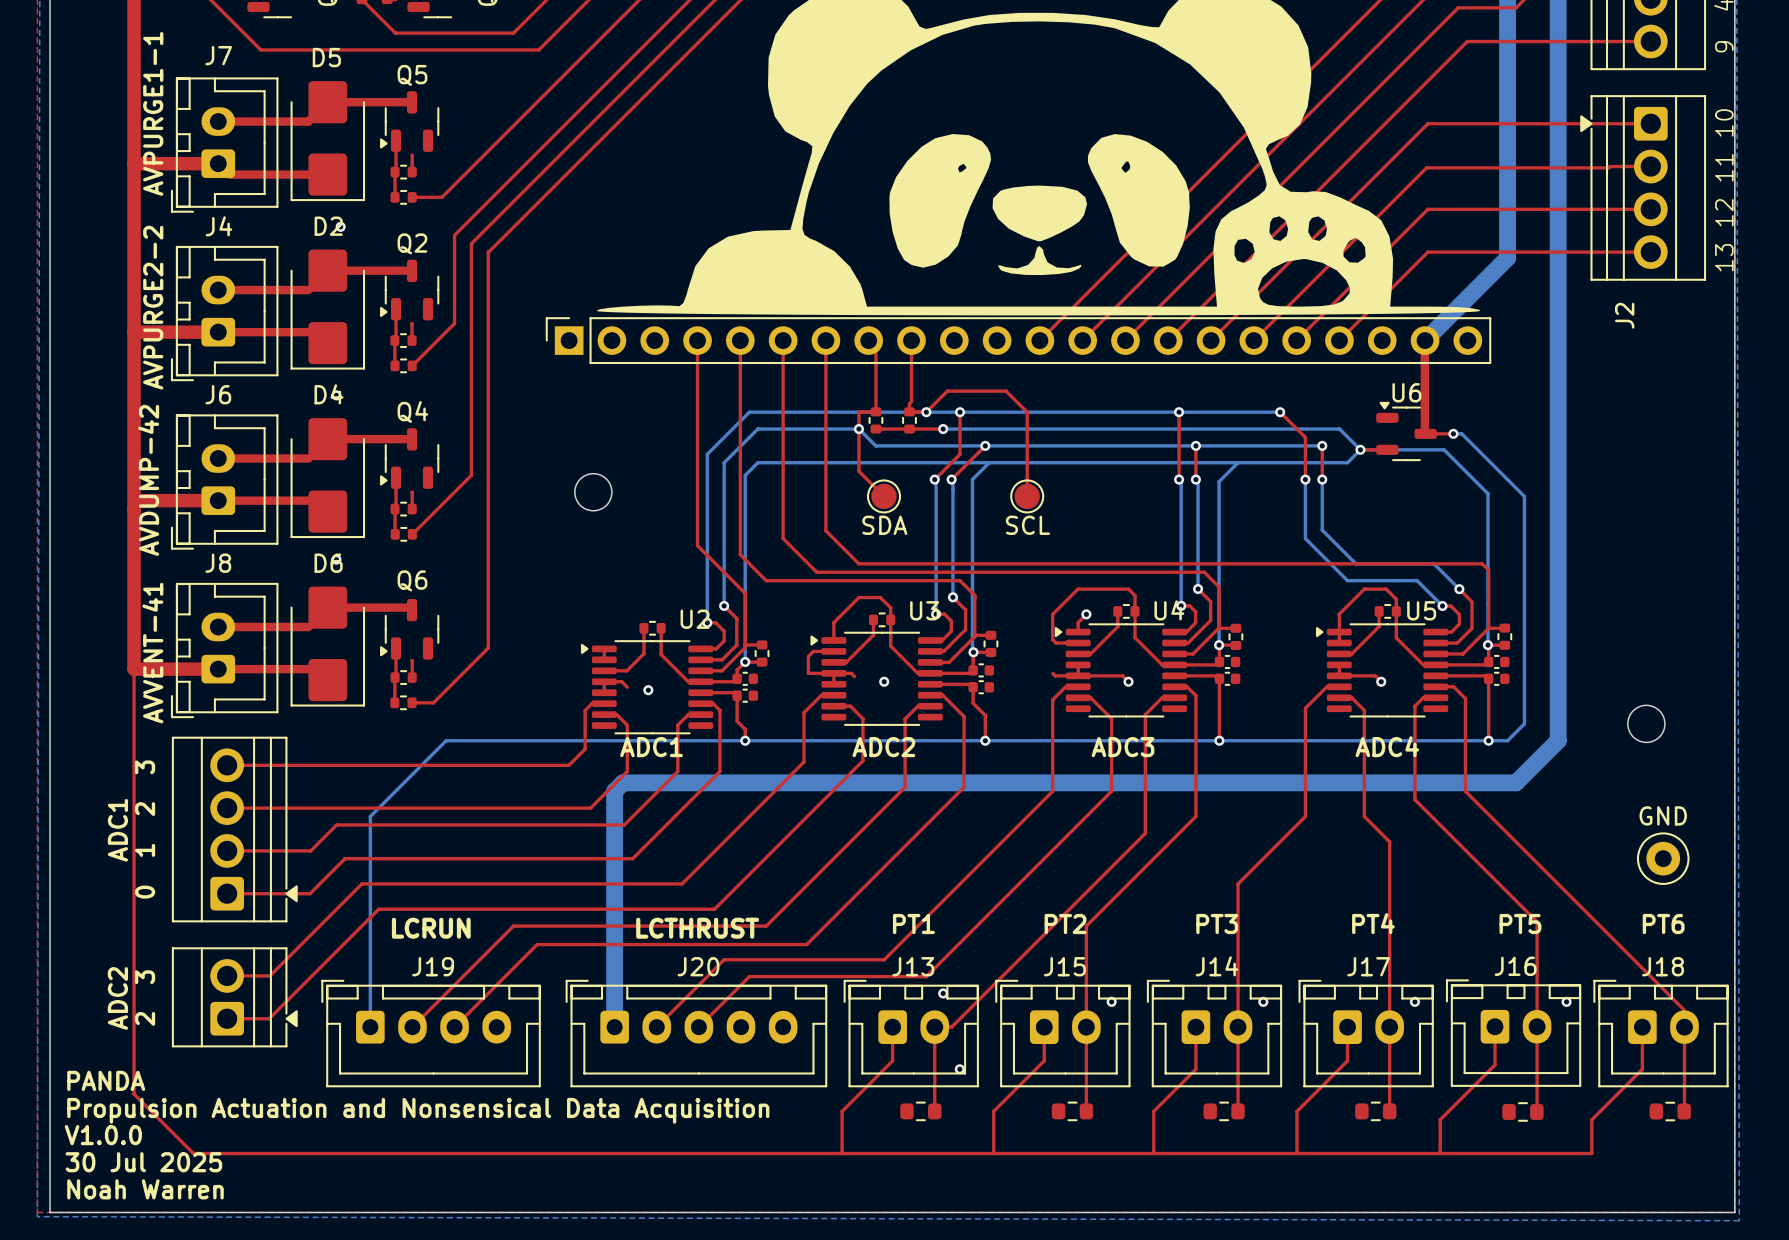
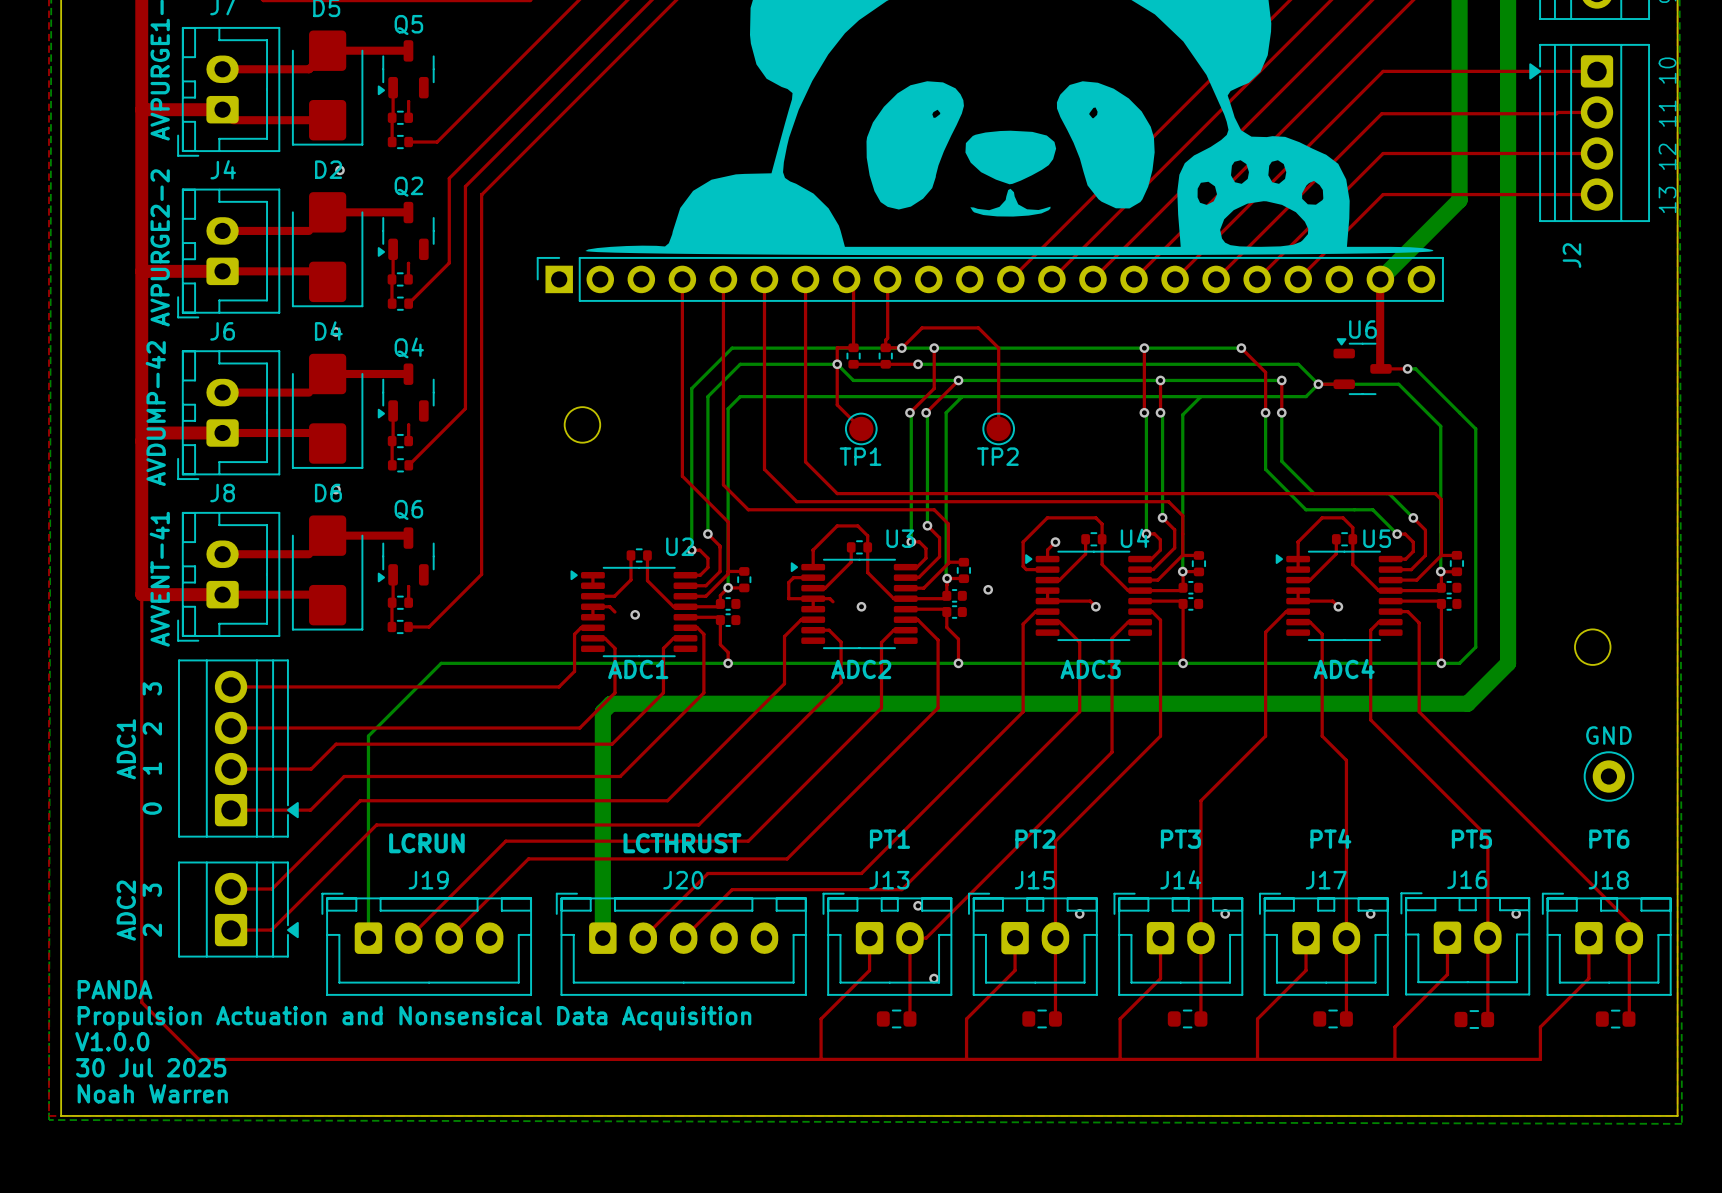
SDA name: SDA (884, 525) -> TP1 (860, 456)
SCL name: SCL (1028, 525) -> TP2 (997, 456)
via: none -> (988, 589)
top track: (1052, 673) (1055, 675) (1078, 675) -> none

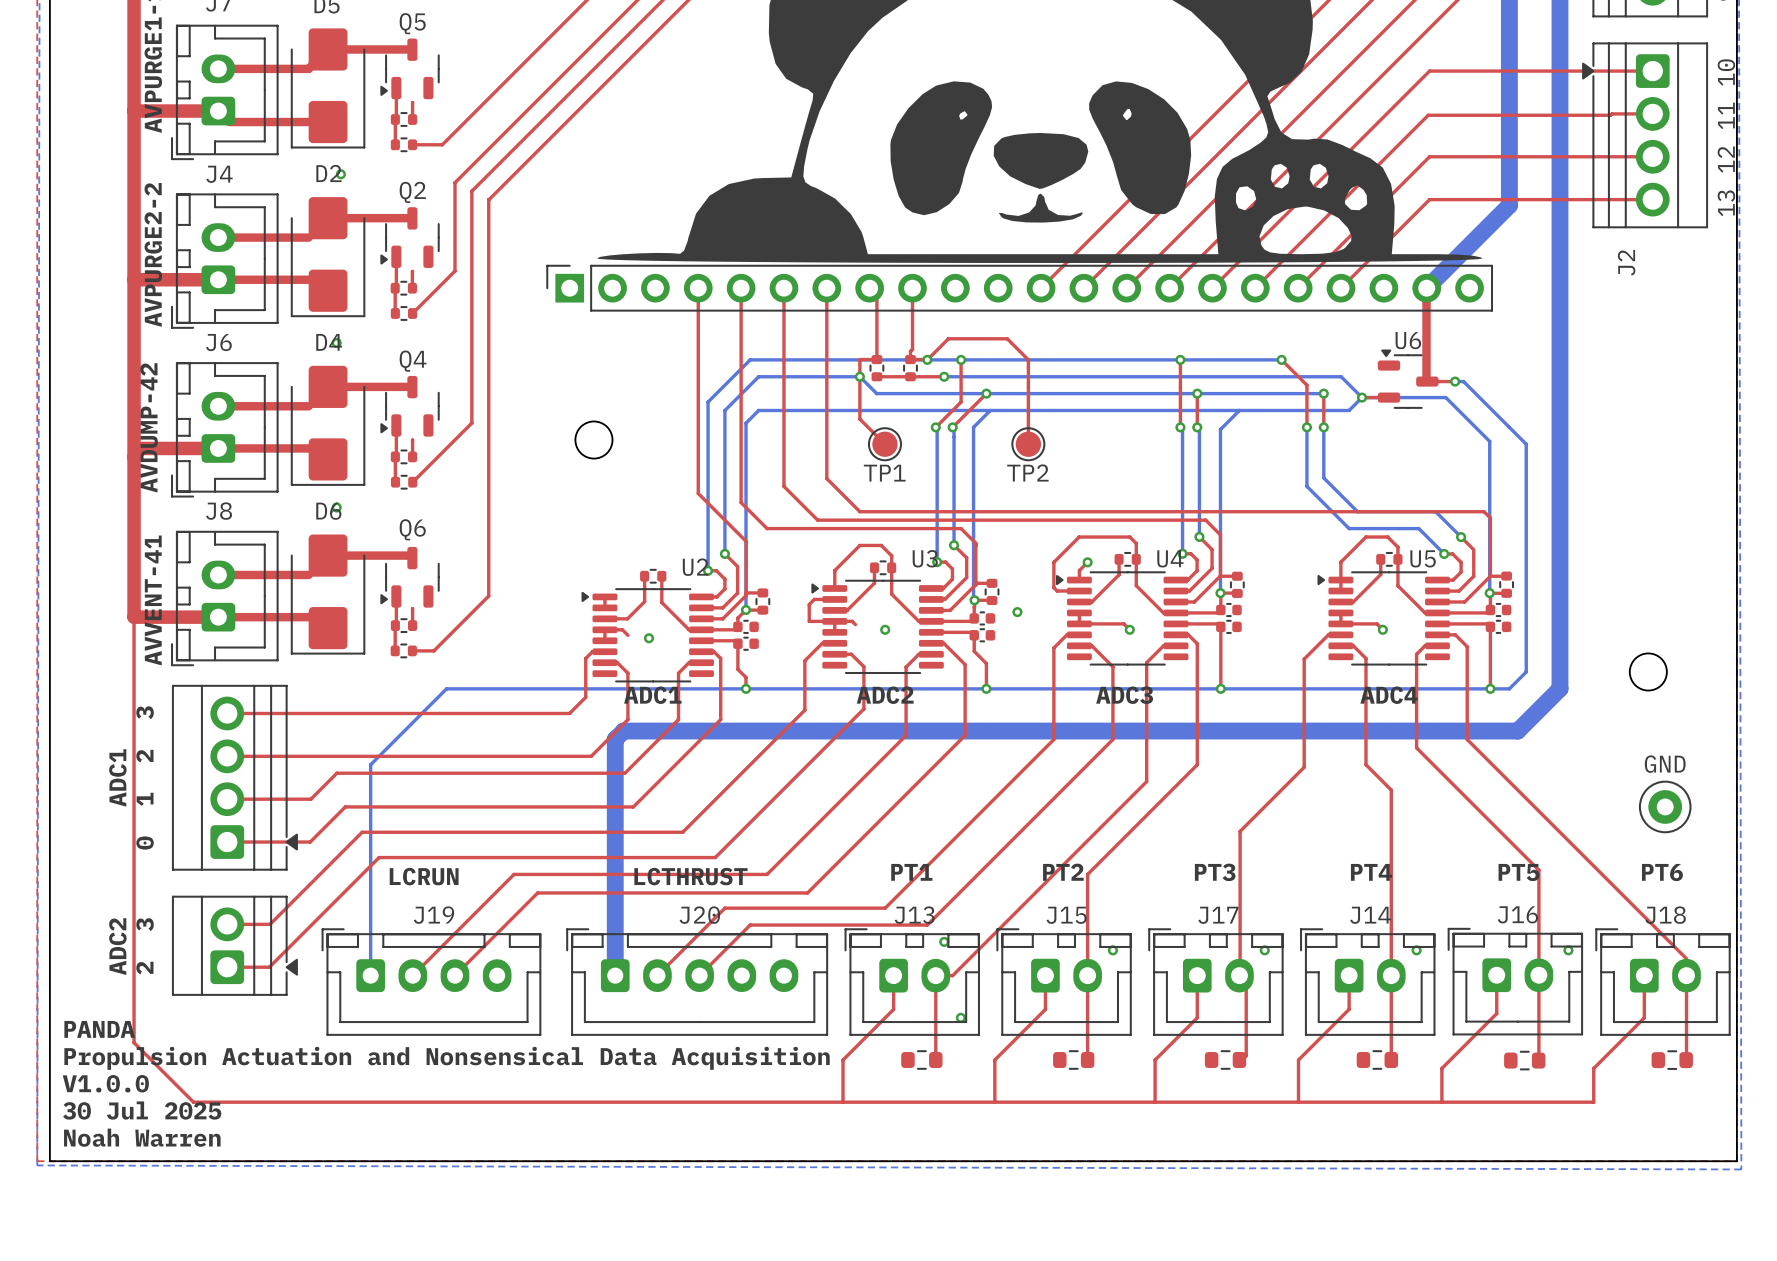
top track: (1265, 632) (1265, 736) (1200, 800) (1200, 1018) -> (1306, 656) (1304, 659) (1304, 767) (1240, 831) (1240, 975)
J14 name: J14 (1180, 879) -> J17 (1218, 915)
J17 name: J17 (1326, 880) -> J14 (1370, 915)
top track: none -> (1246, 975) (1246, 1055) (1241, 1060)

